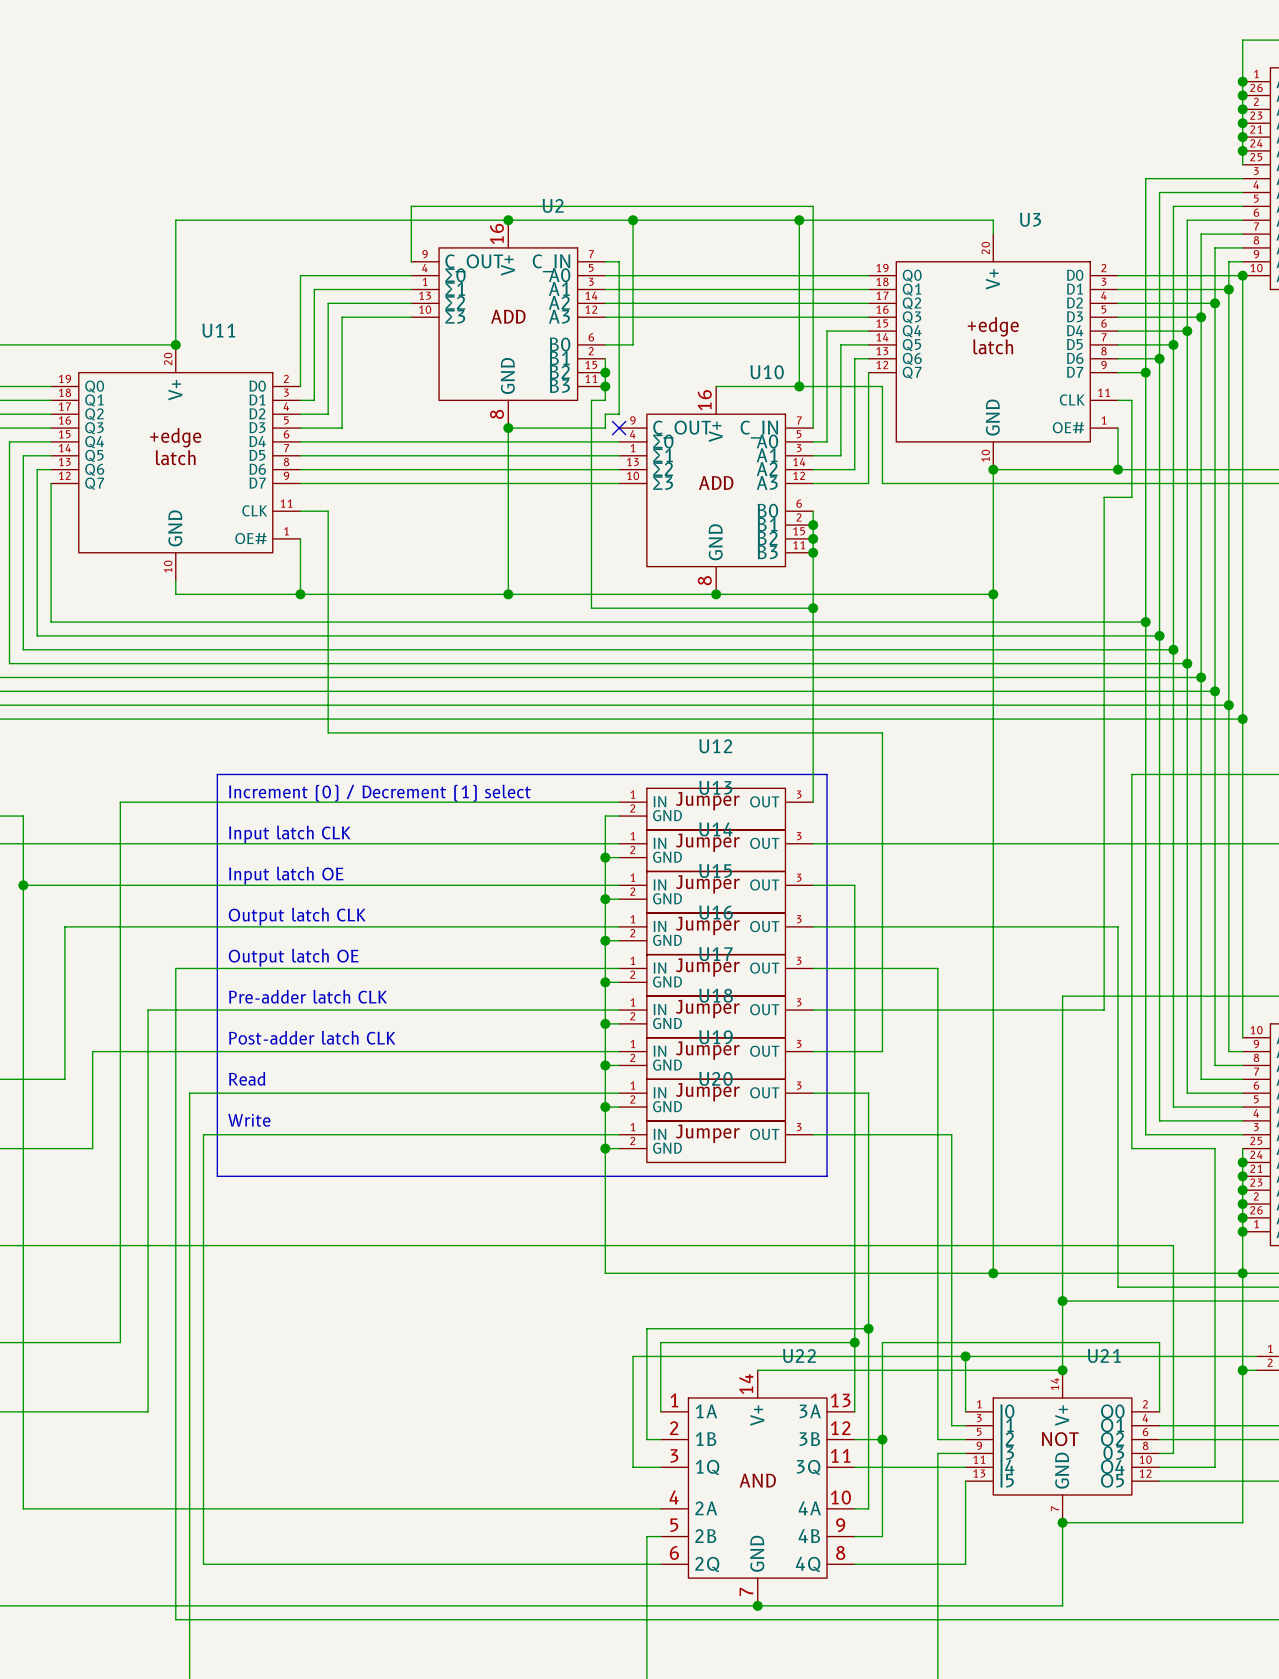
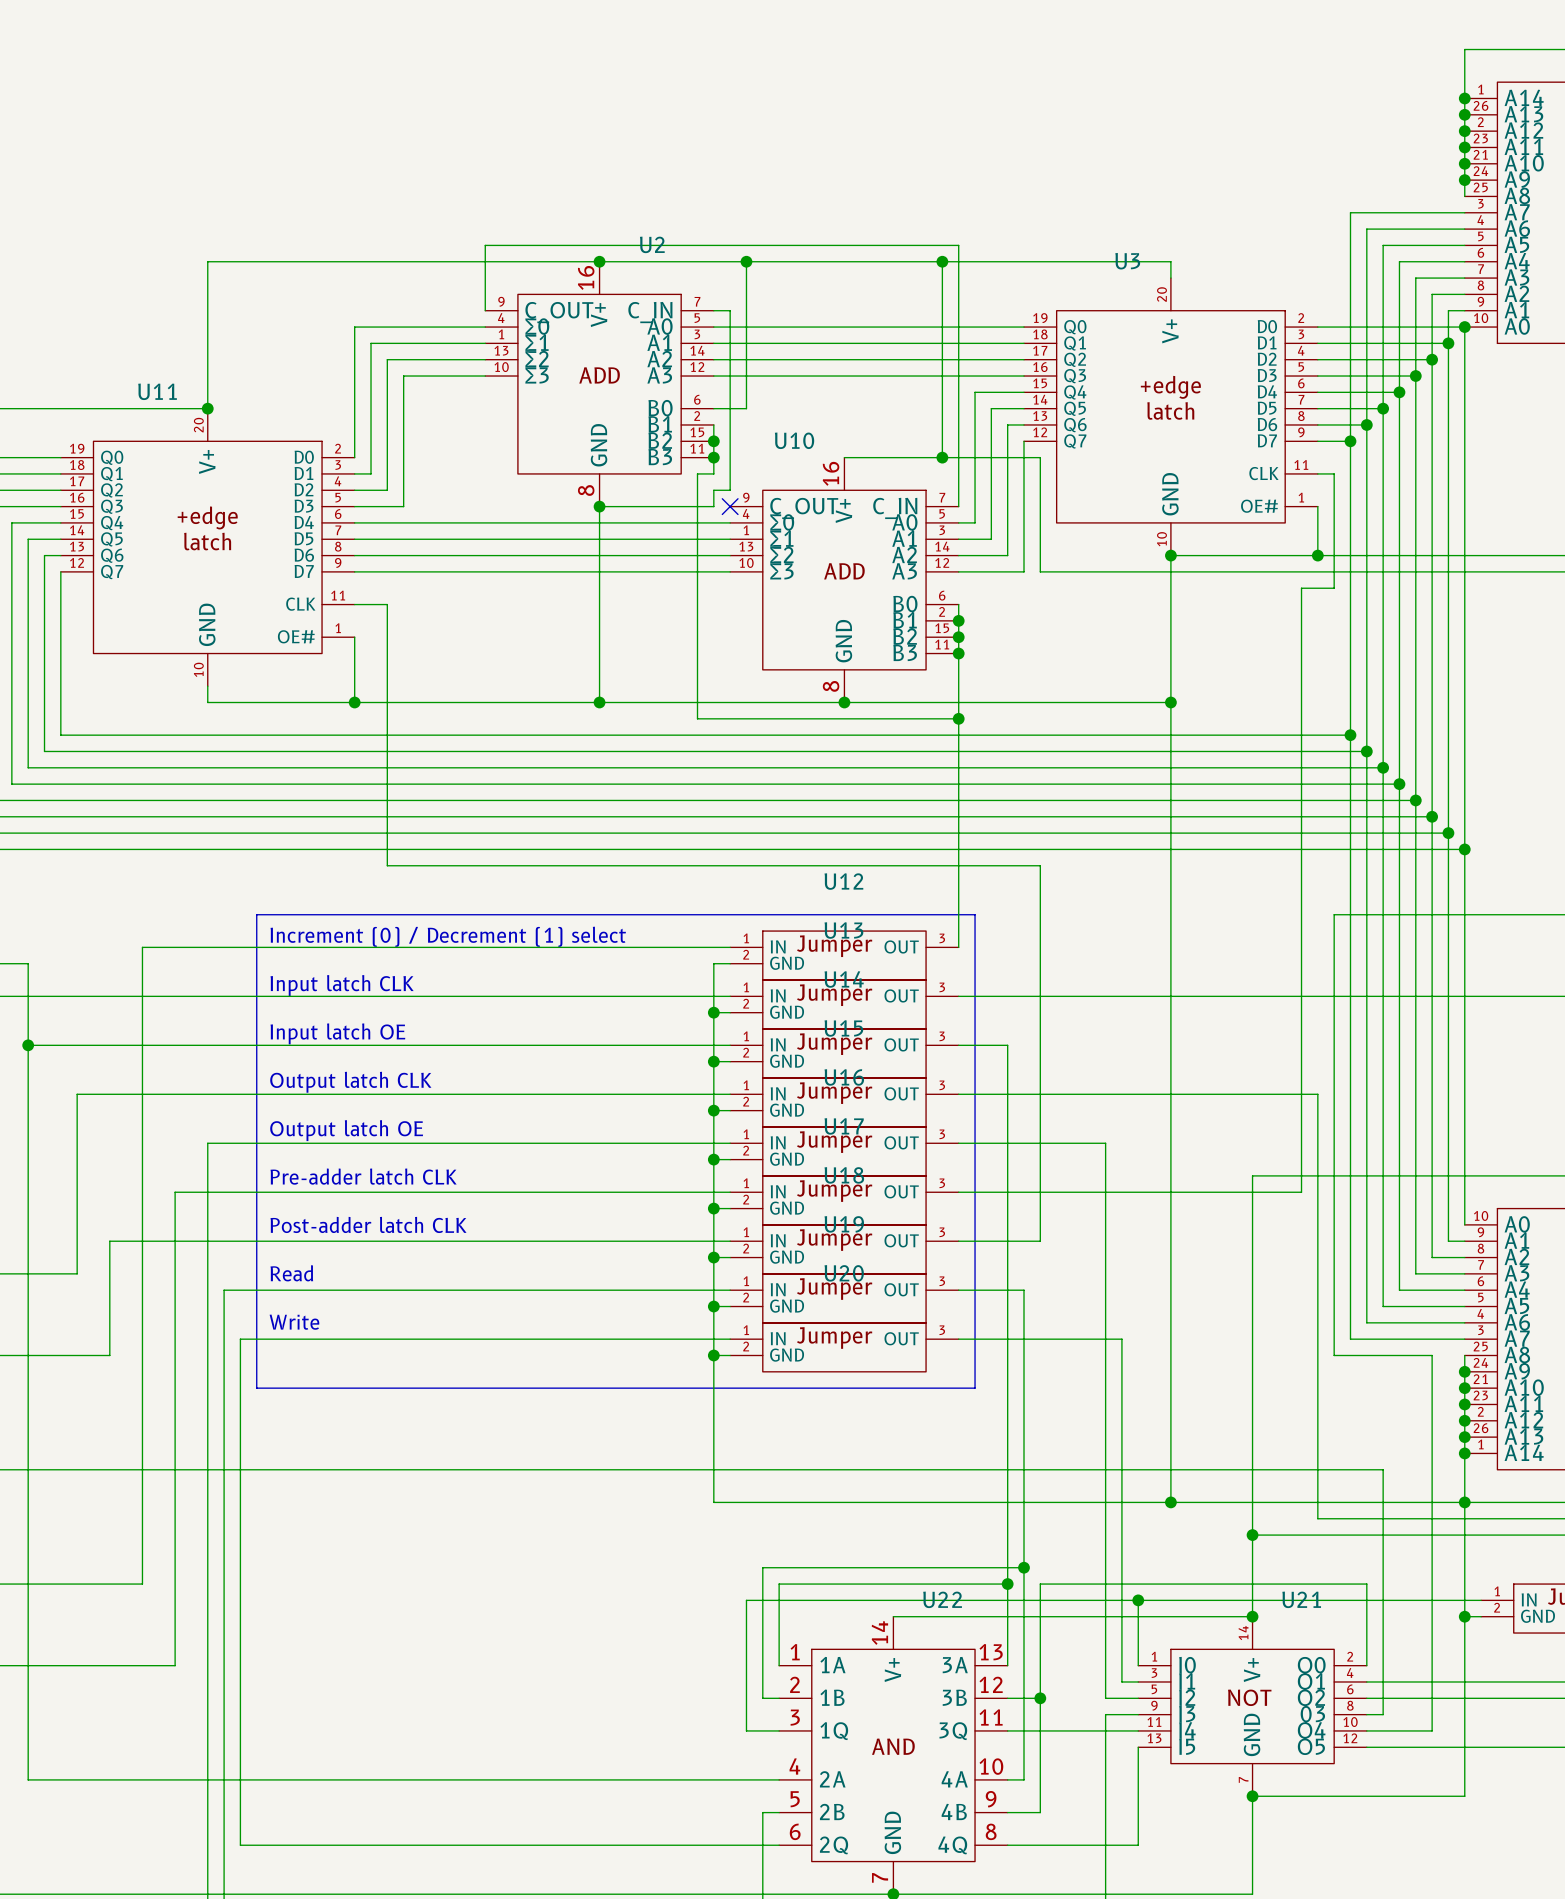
U3 name position: U3 (1030, 219) -> U3 (1127, 261)
U11 name position: U11 (218, 330) -> U11 (157, 391)
U10 name position: U10 (767, 372) -> U10 (794, 440)

